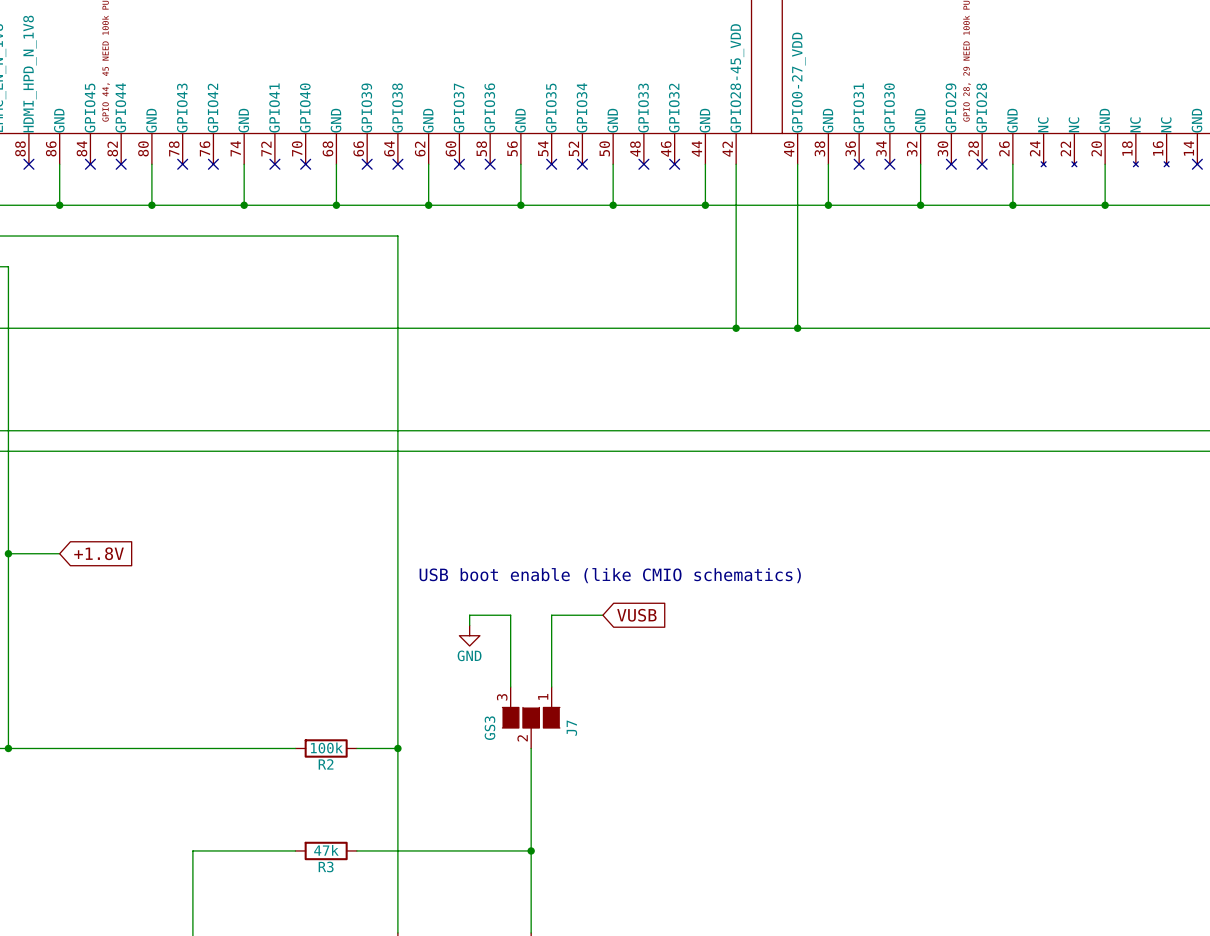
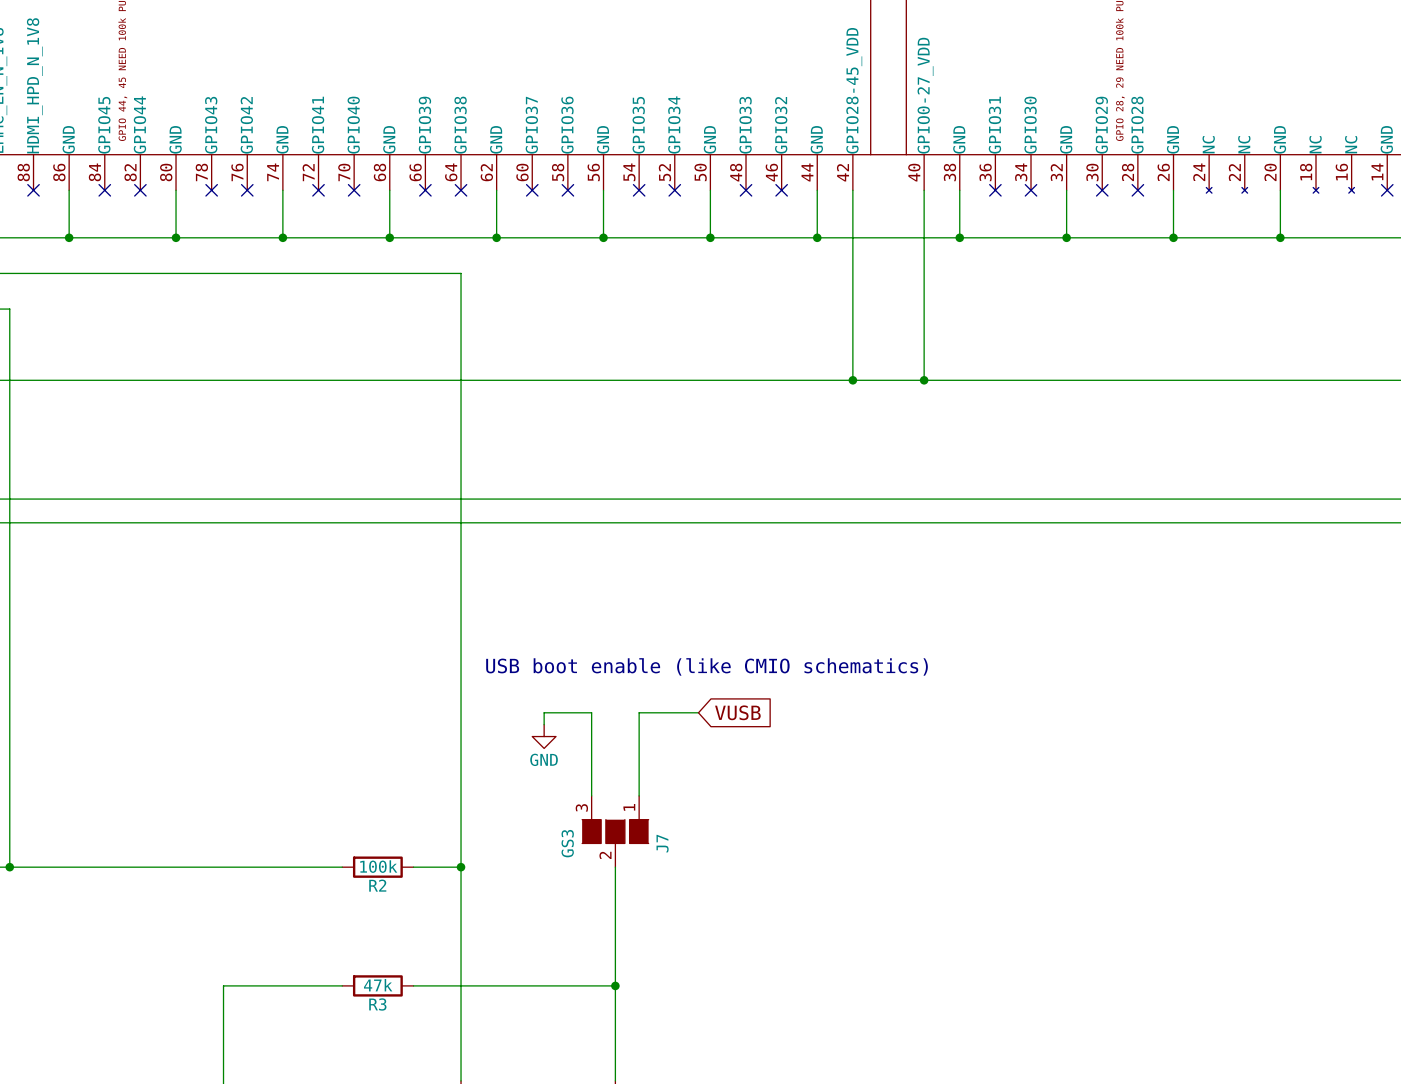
wire: (8, 553) (59, 553) -> none
junction: (8, 553) -> none
global label: +1.8V (99, 553) -> none

